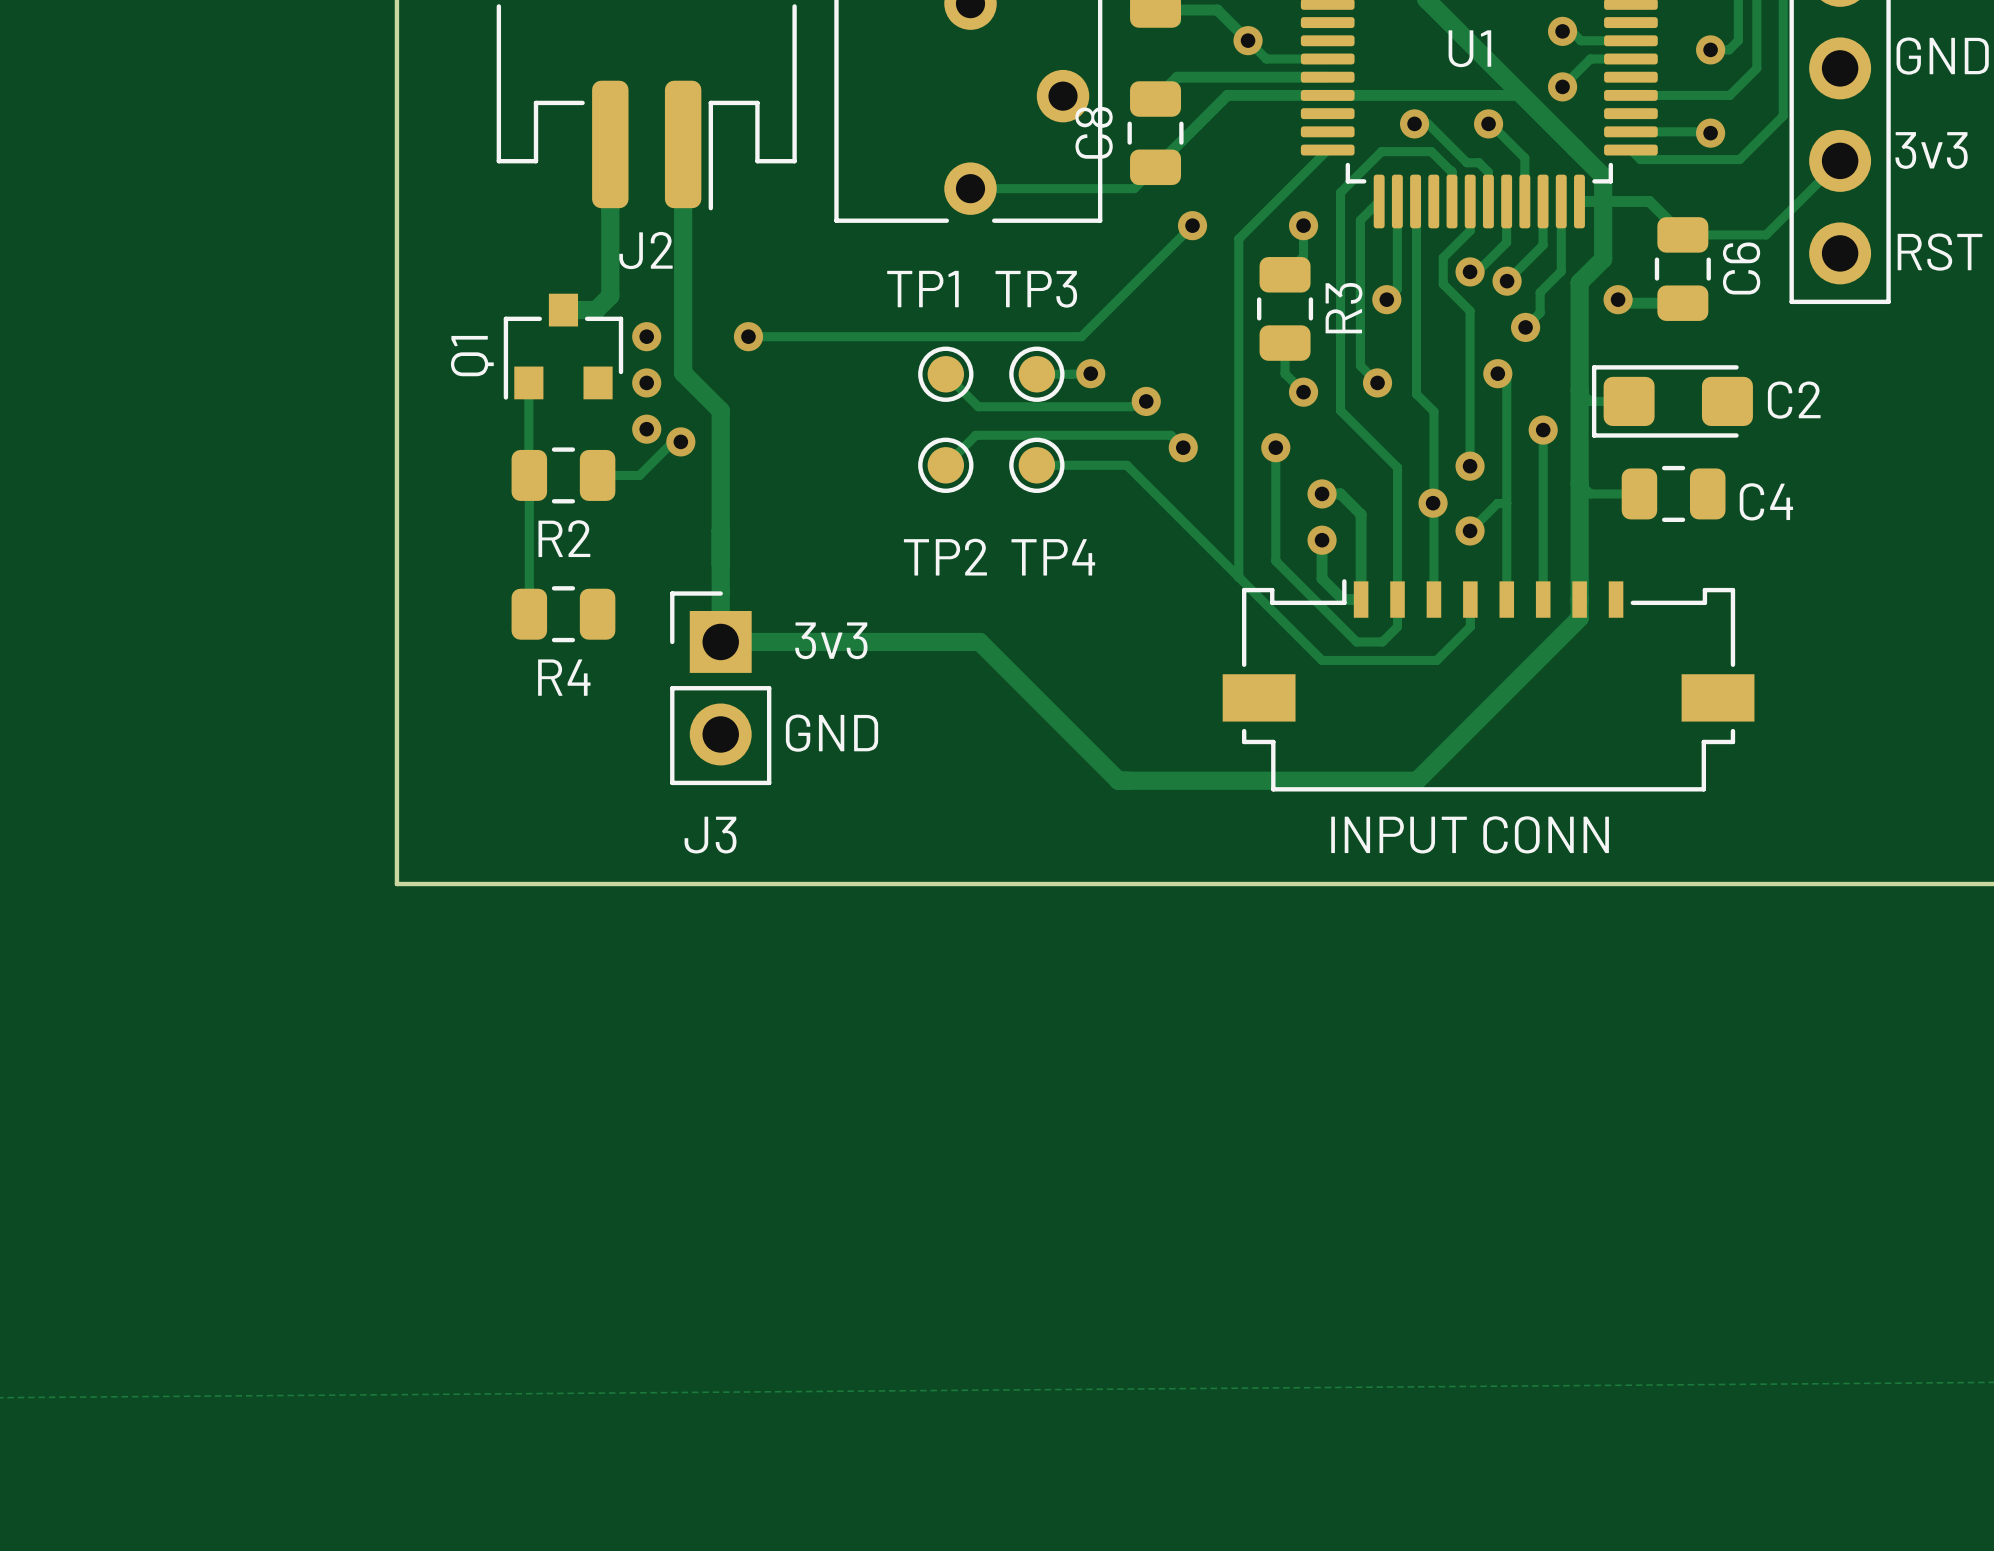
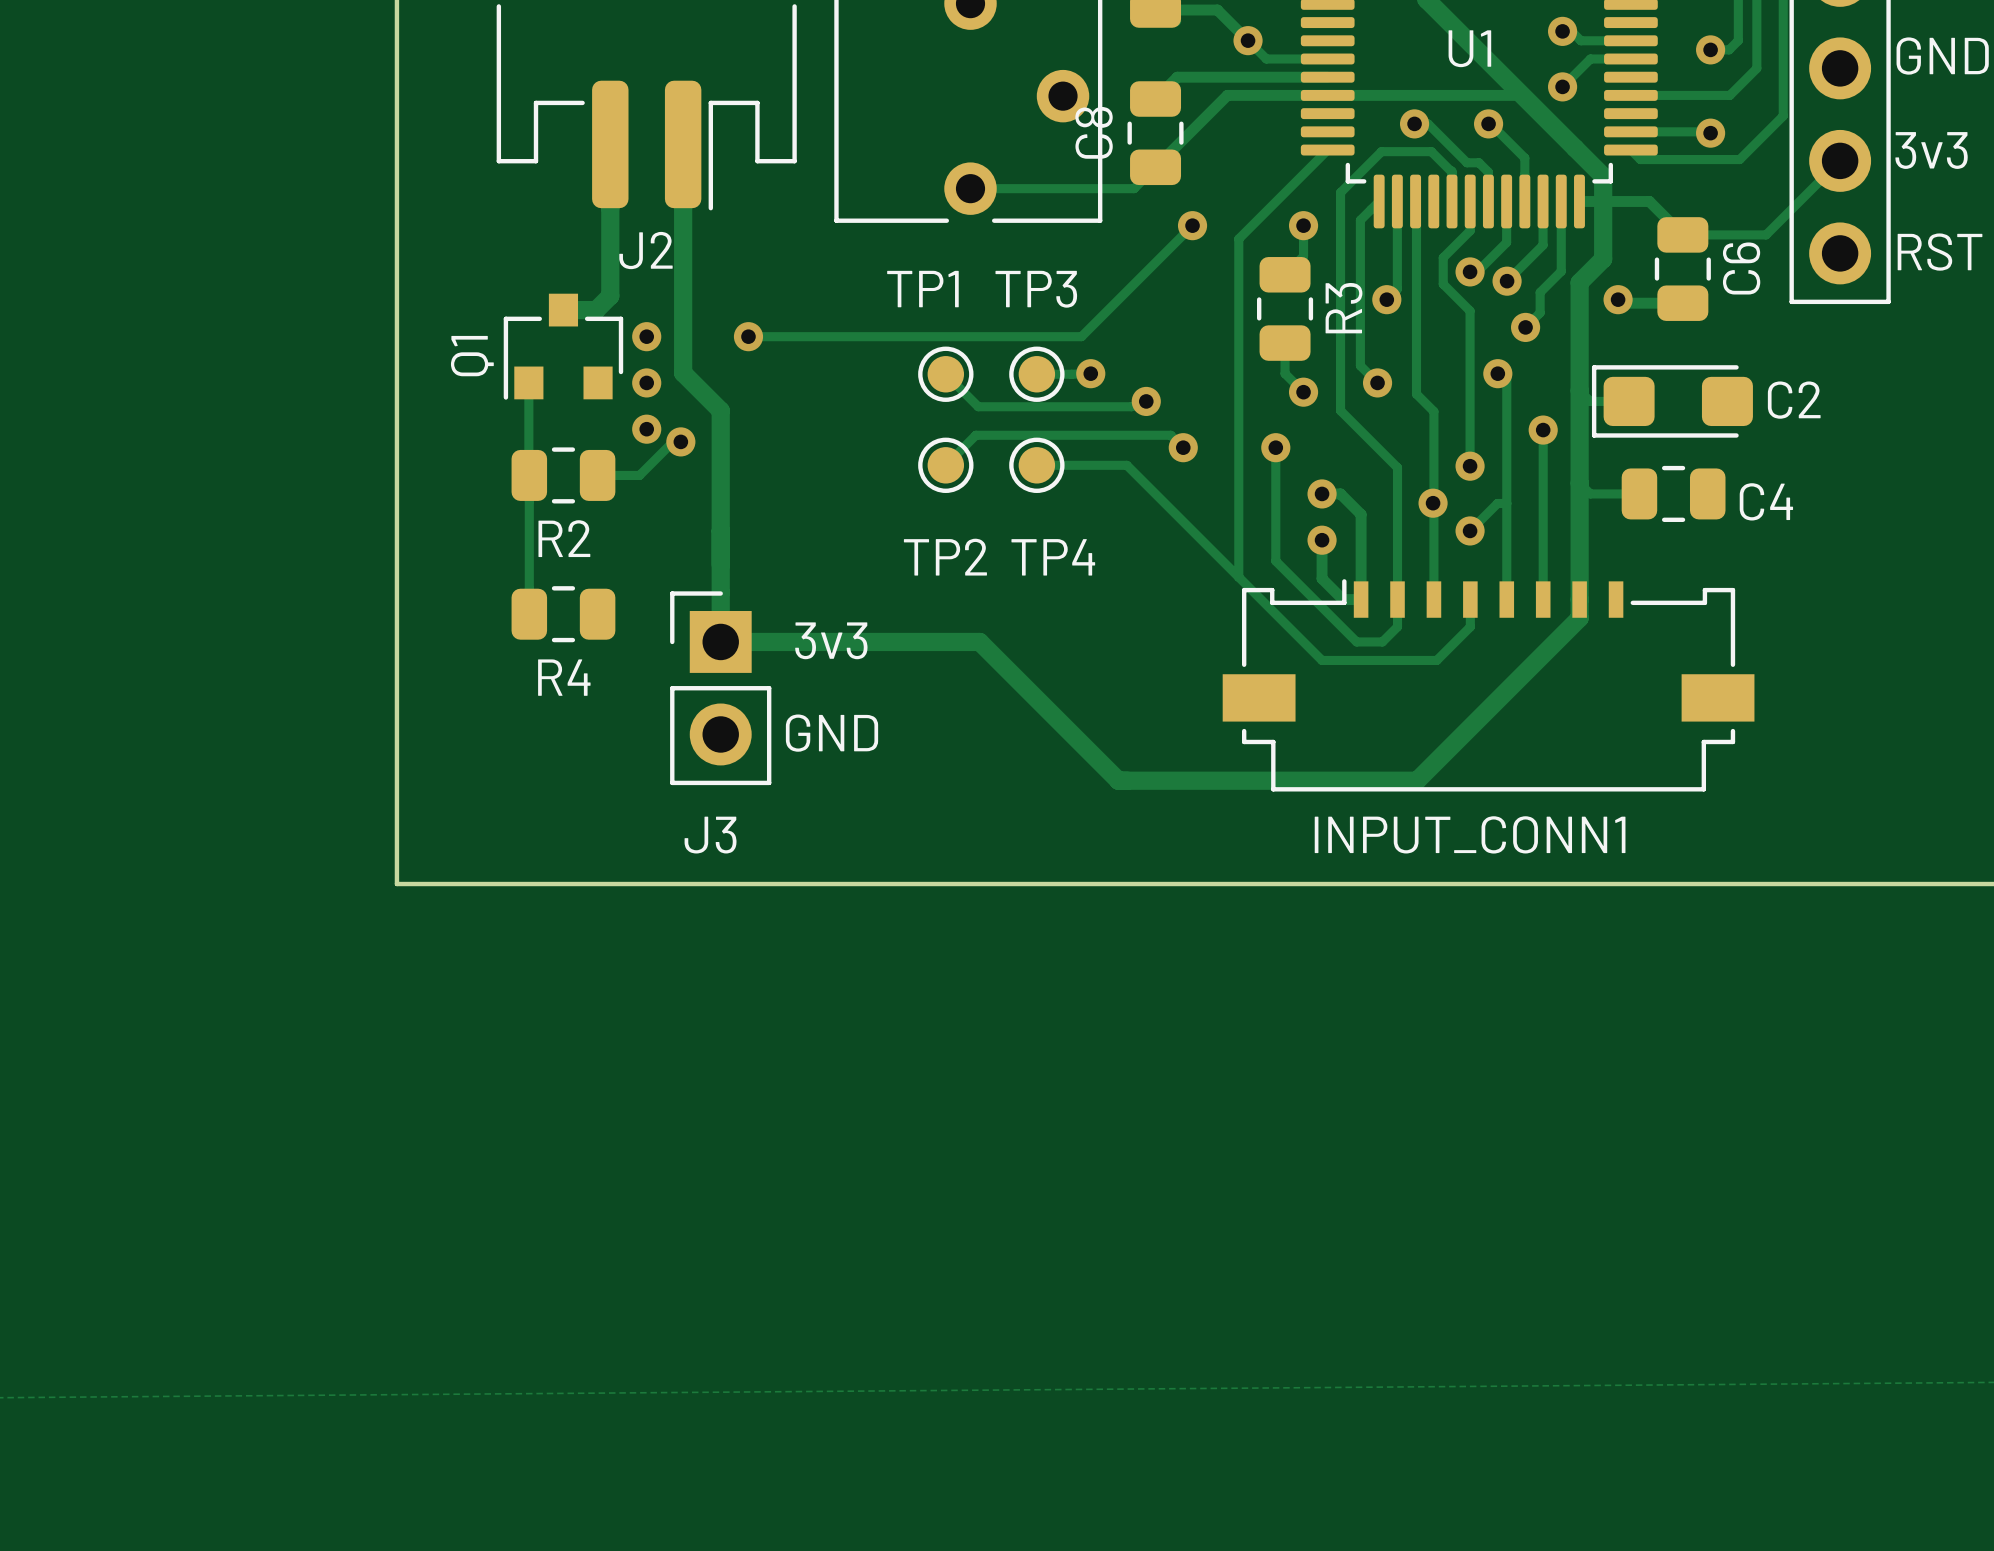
INPUT CONN name: INPUT CONN (1470, 834) -> INPUT_CONN1 (1470, 834)

